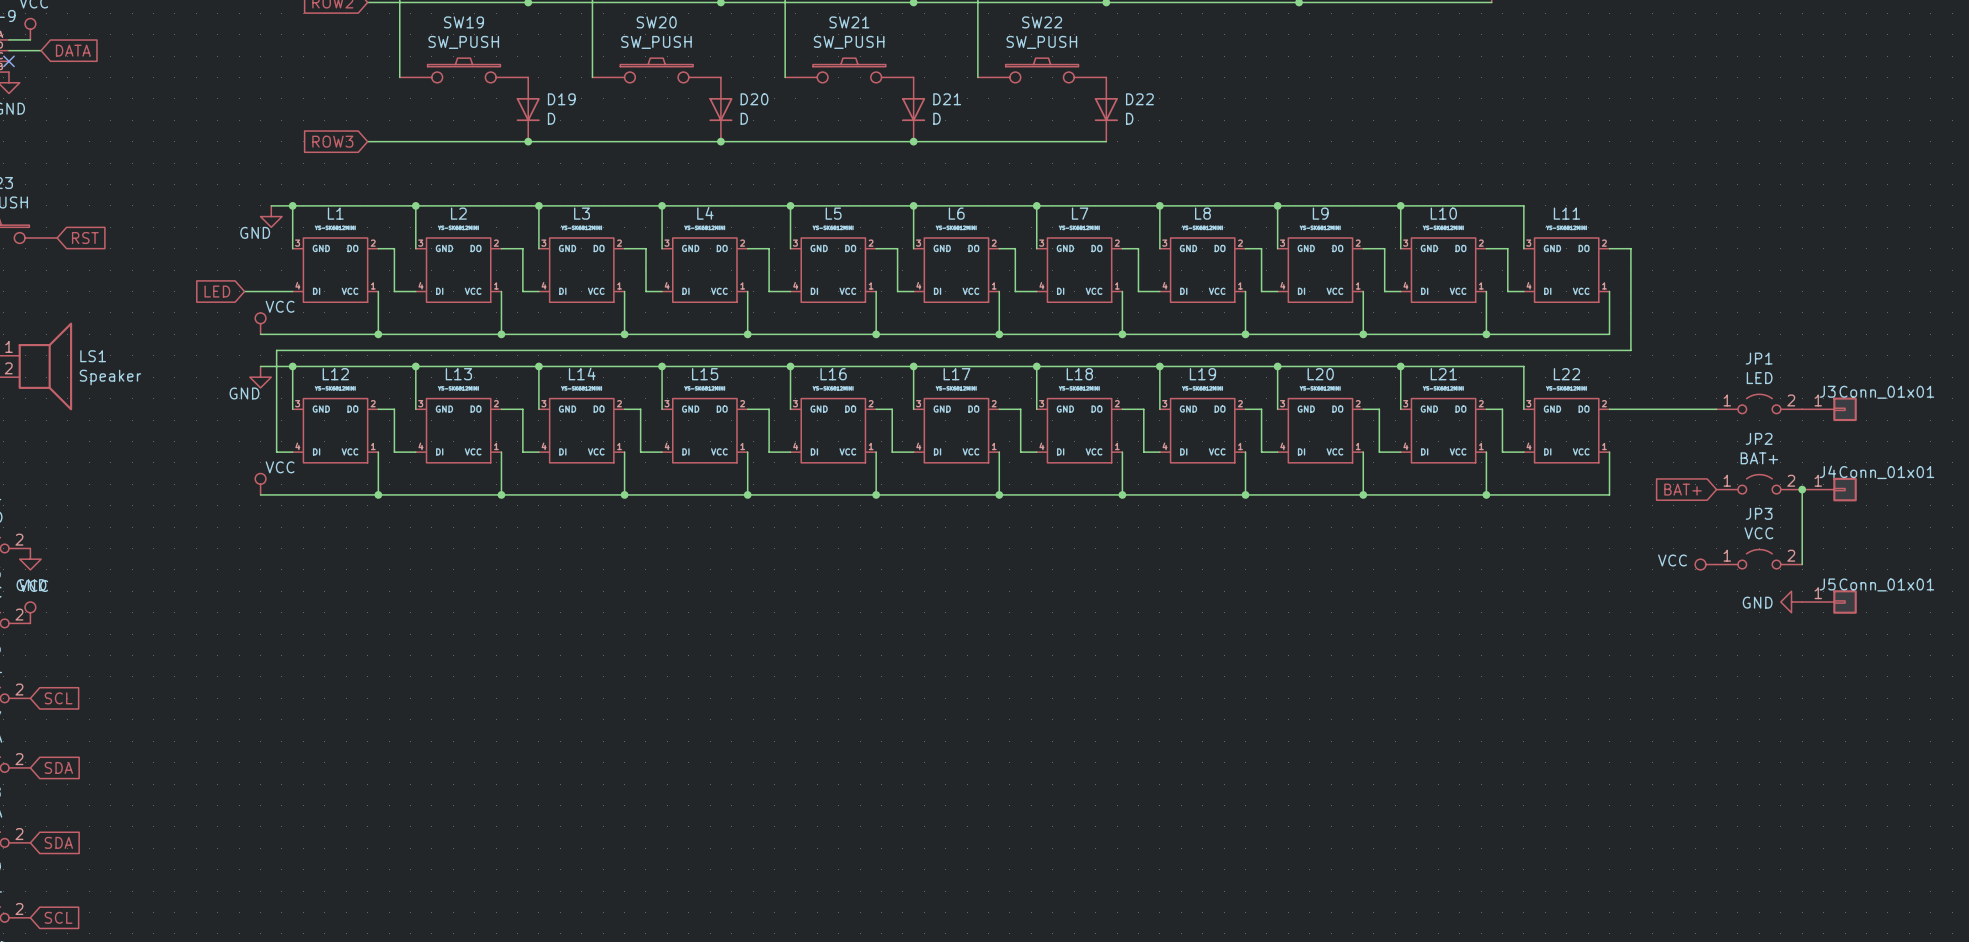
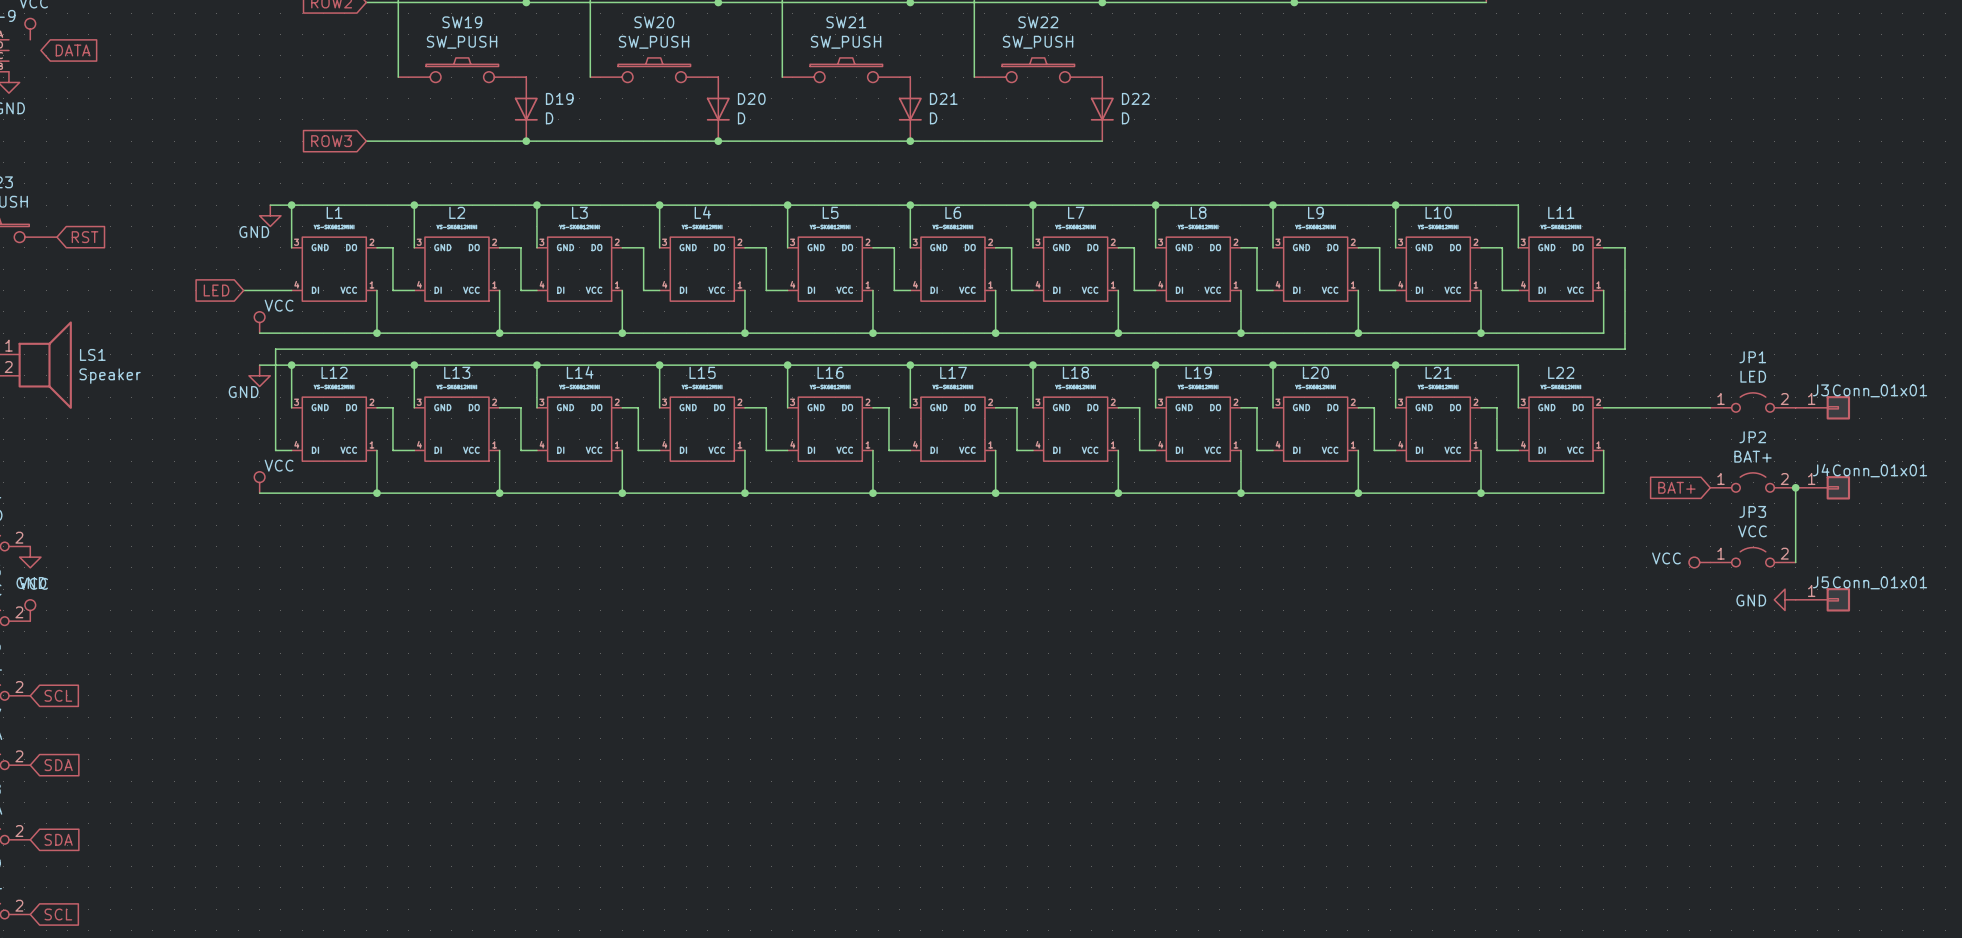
wire: (8, 39) (30, 39) -> none
wire: (8, 50) (41, 50) -> none
no-connect mark: (8, 61) -> none

